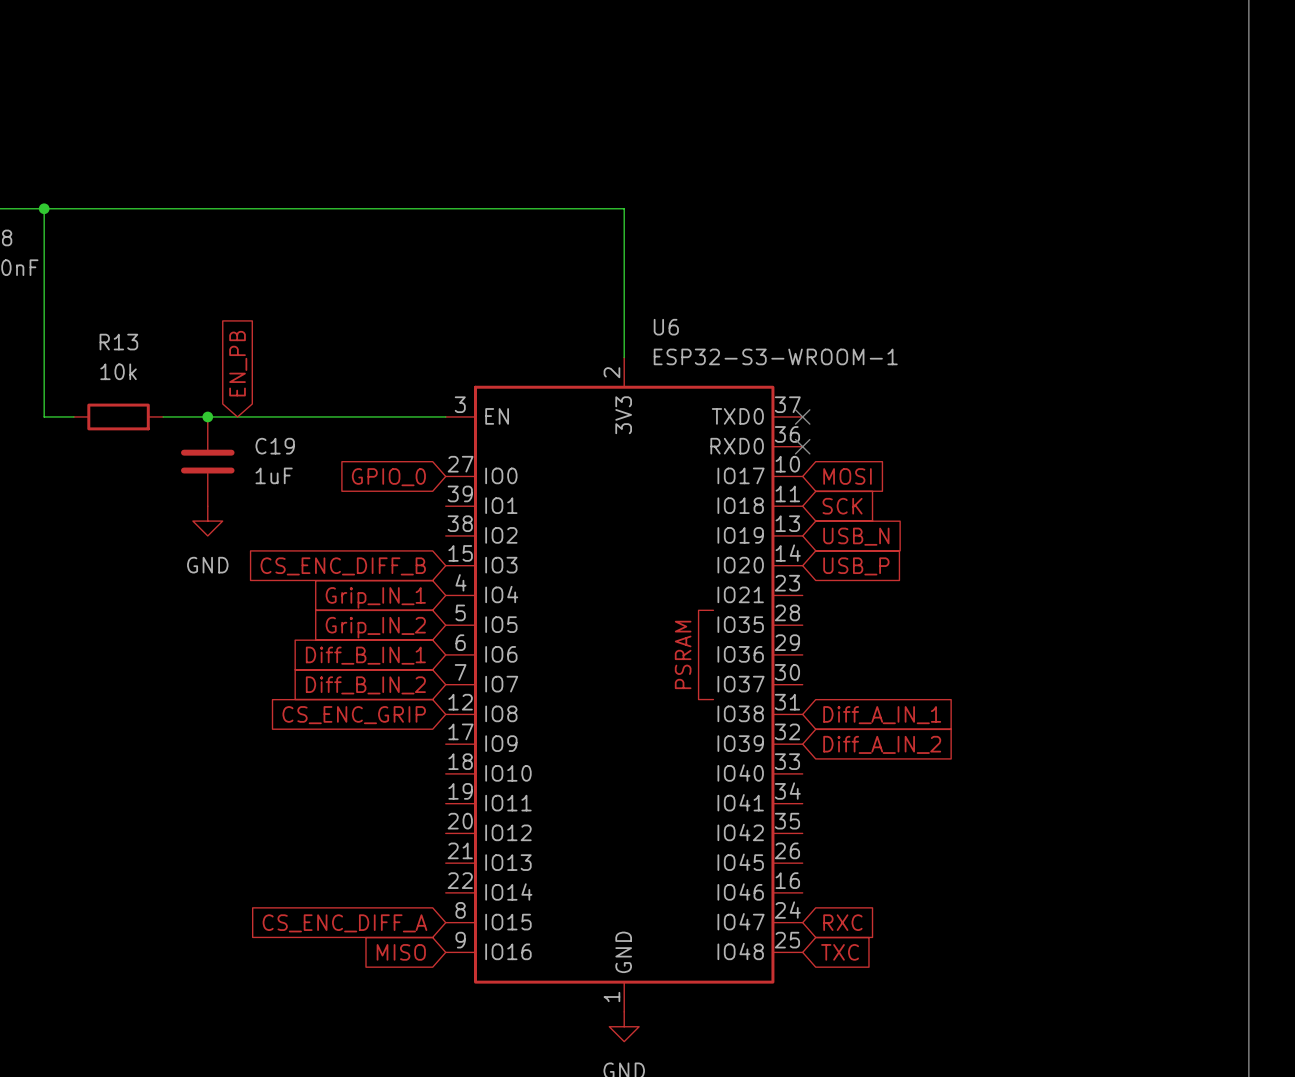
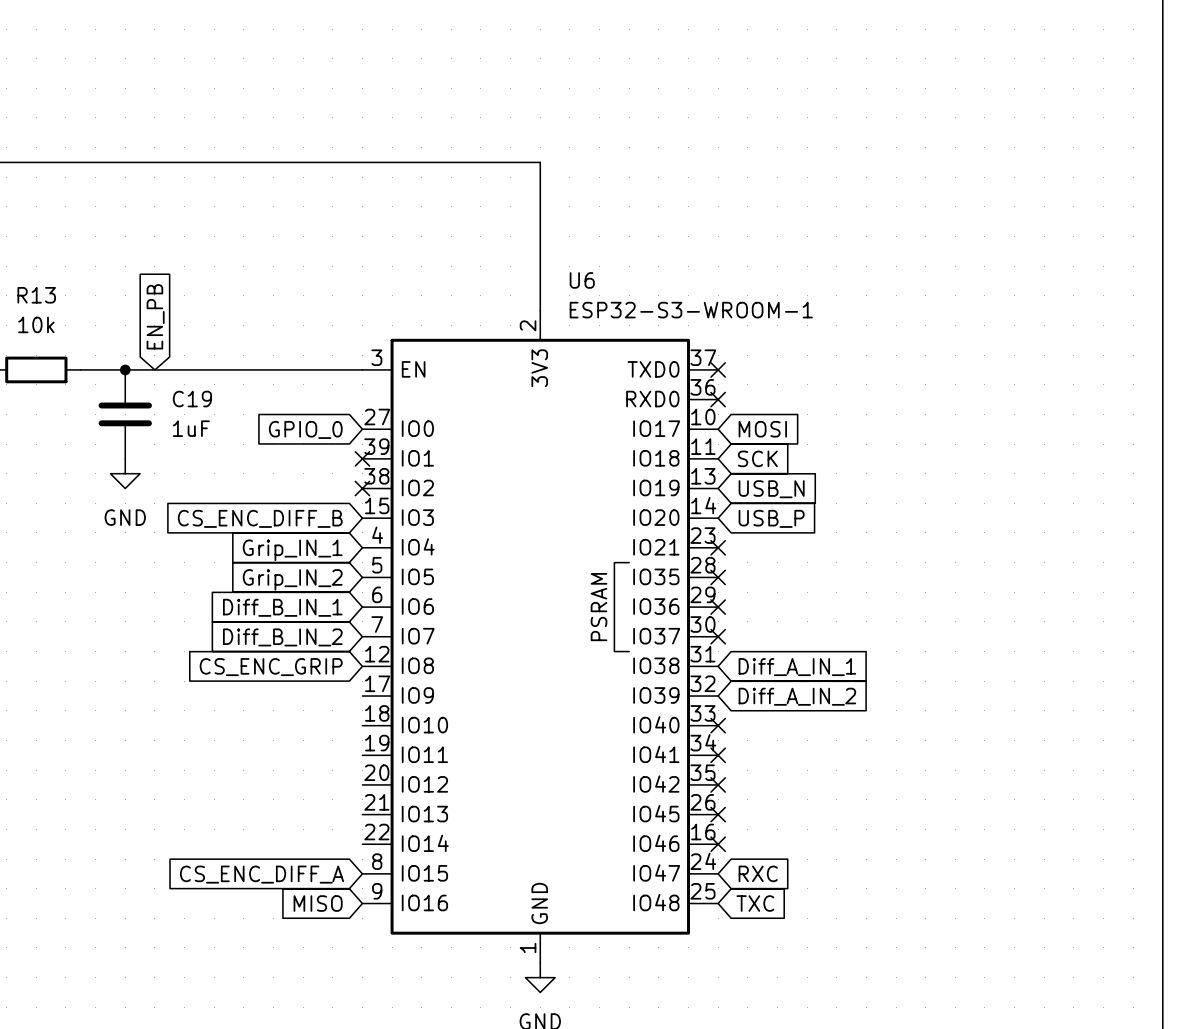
no-connect mark: none -> (362, 458)
no-connect mark: none -> (362, 488)
no-connect mark: none -> (718, 547)
no-connect mark: none -> (718, 577)
no-connect mark: none -> (718, 607)
no-connect mark: none -> (718, 636)
no-connect mark: none -> (718, 725)
no-connect mark: none -> (718, 755)
no-connect mark: none -> (718, 784)
no-connect mark: none -> (718, 814)
no-connect mark: none -> (718, 844)

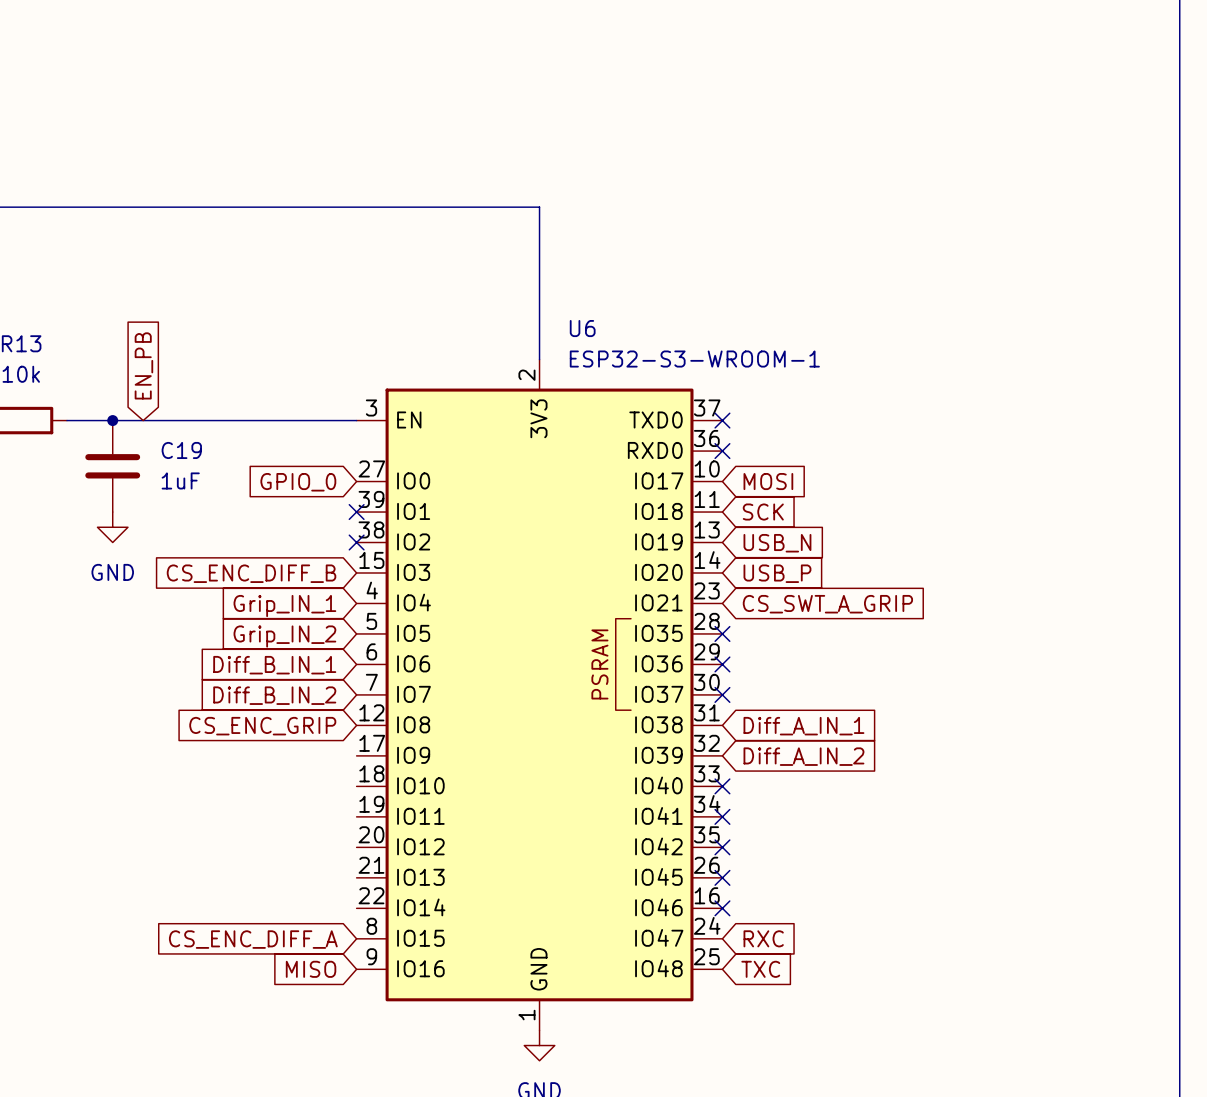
no-connect mark: (718, 547) -> none
global label: none -> CS_SWT_A_GRIP (827, 604)

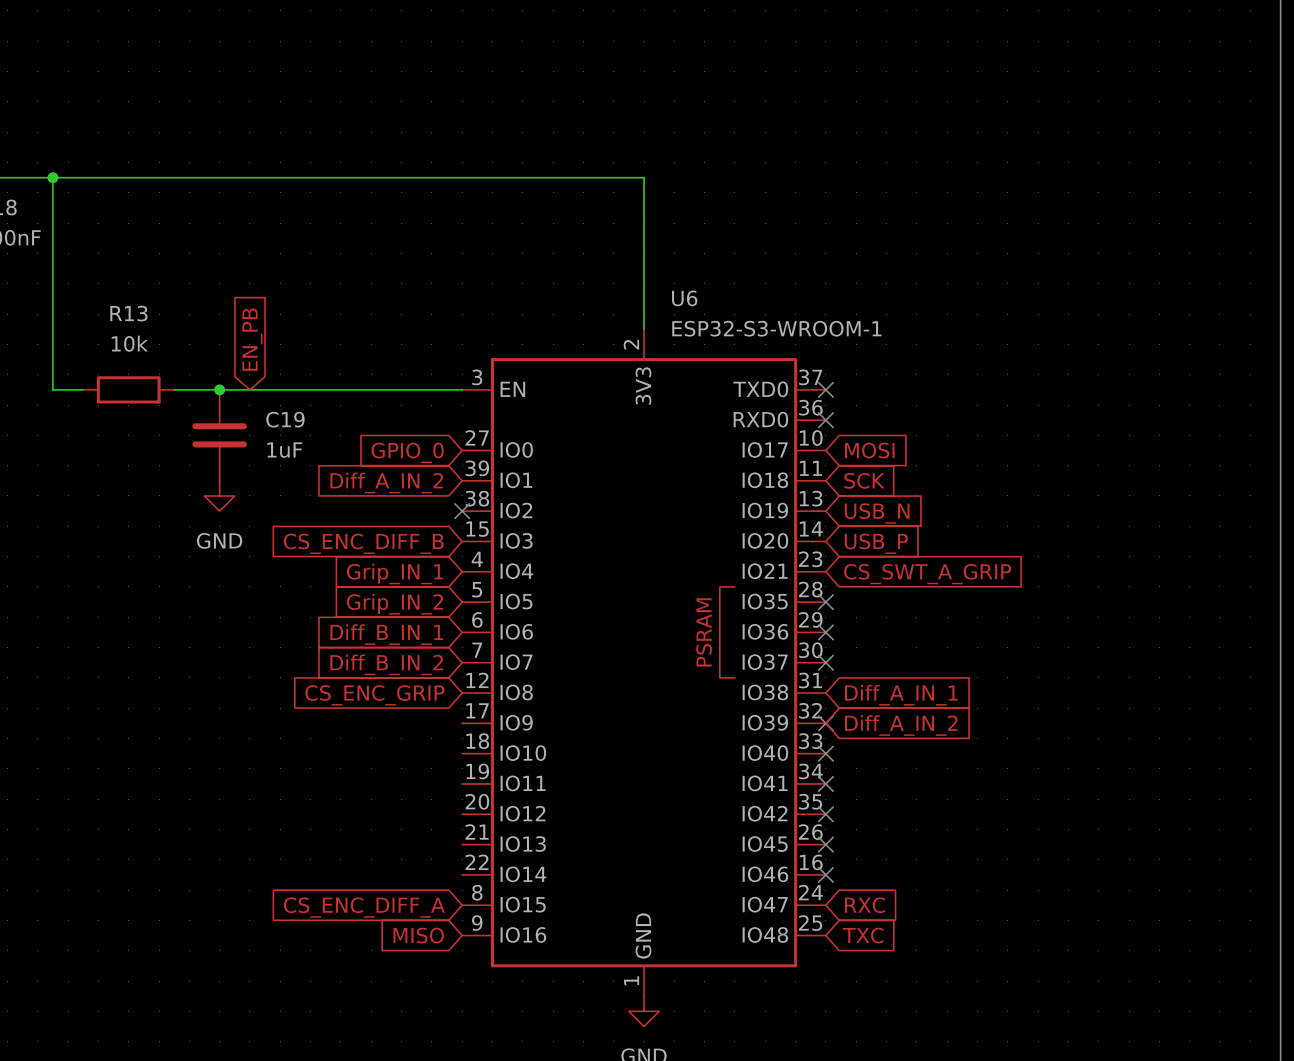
global label: none -> Diff_A_IN_2 (386, 482)
no-connect mark: (356, 512) -> none
no-connect mark: none -> (825, 723)

